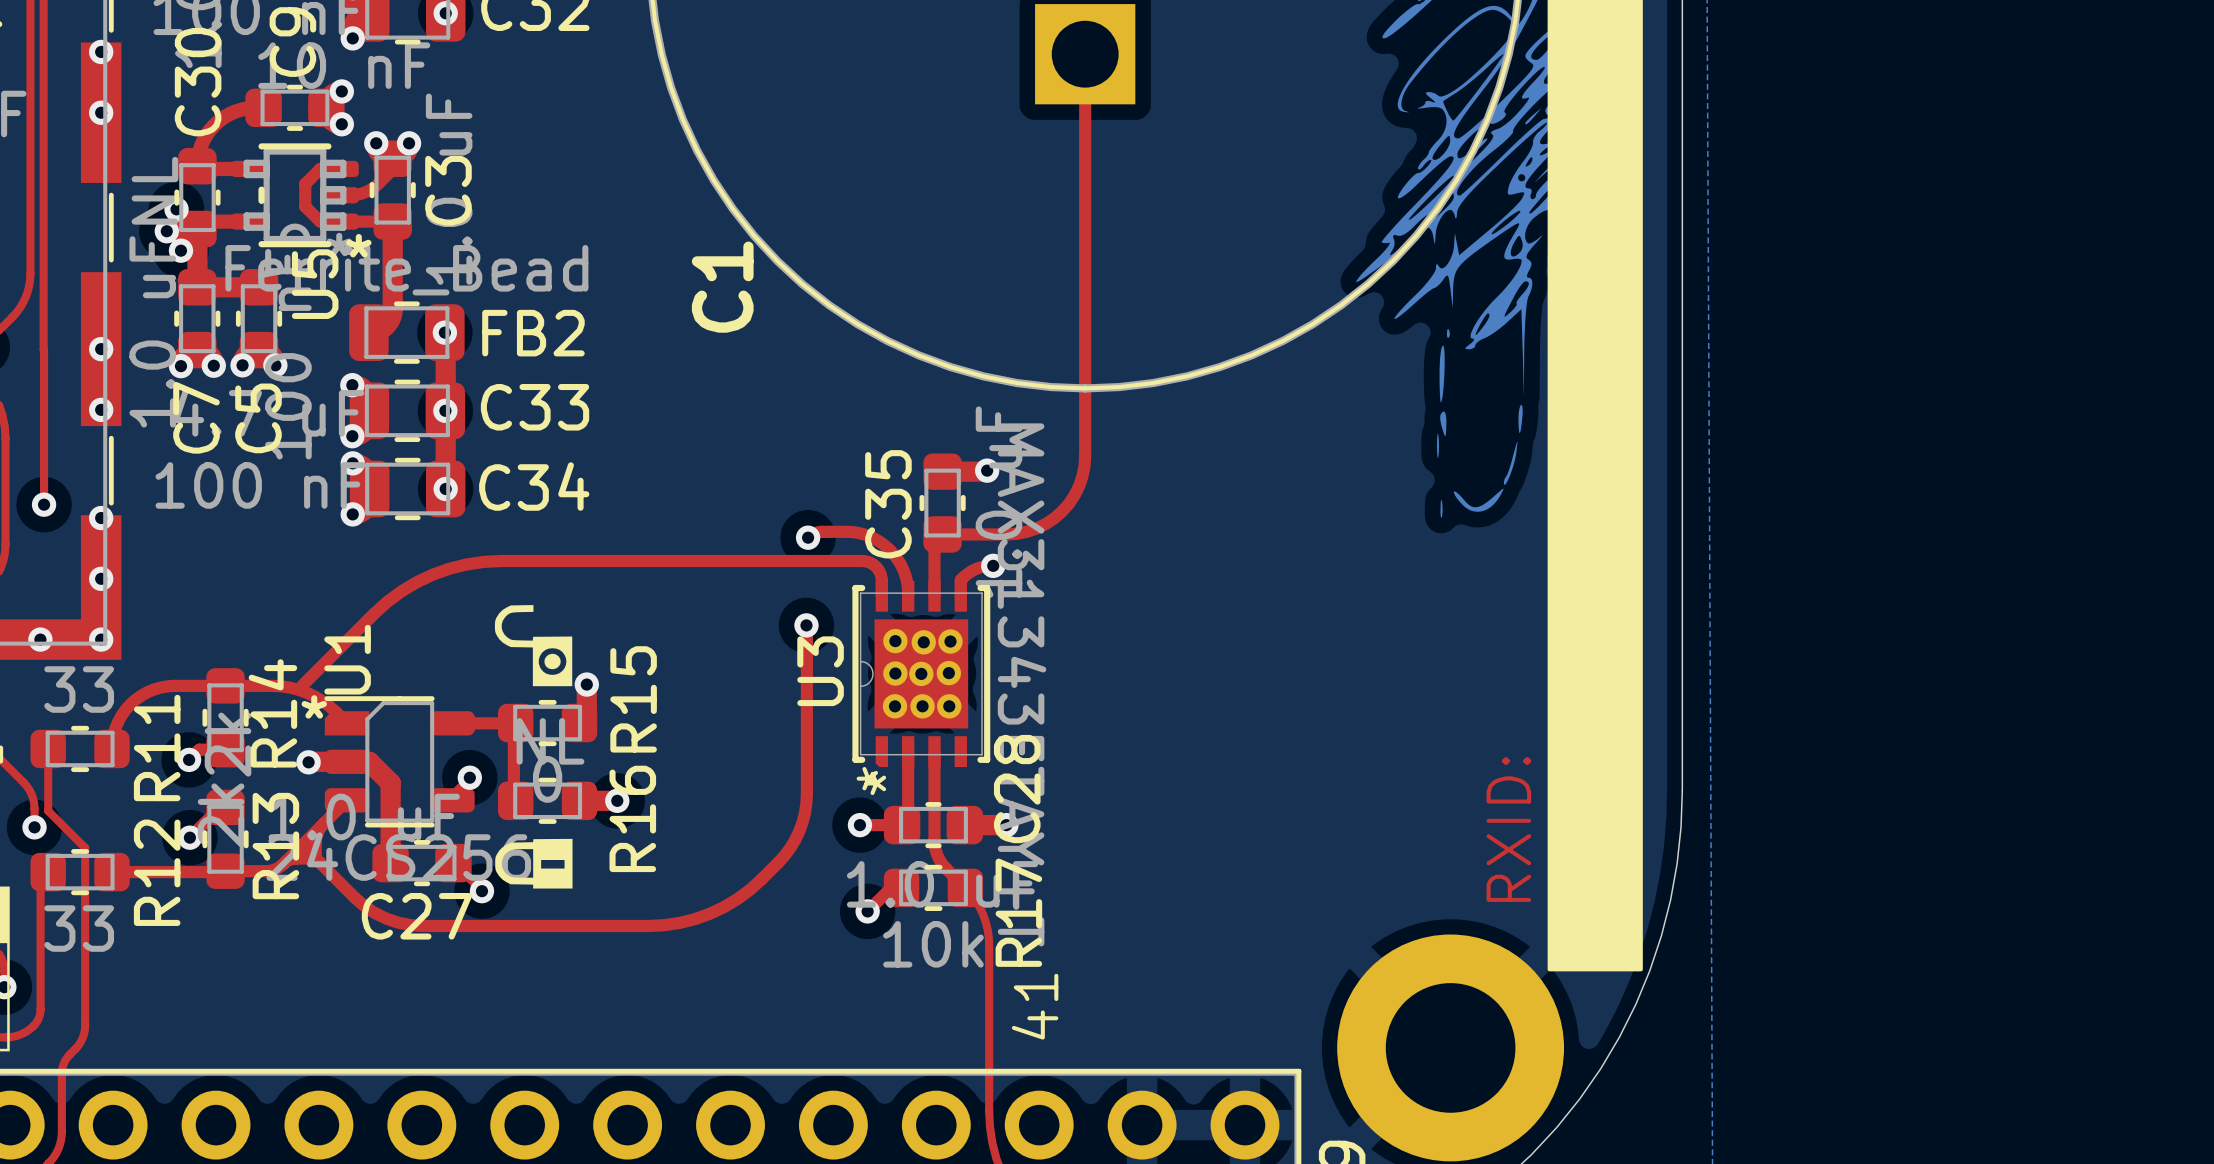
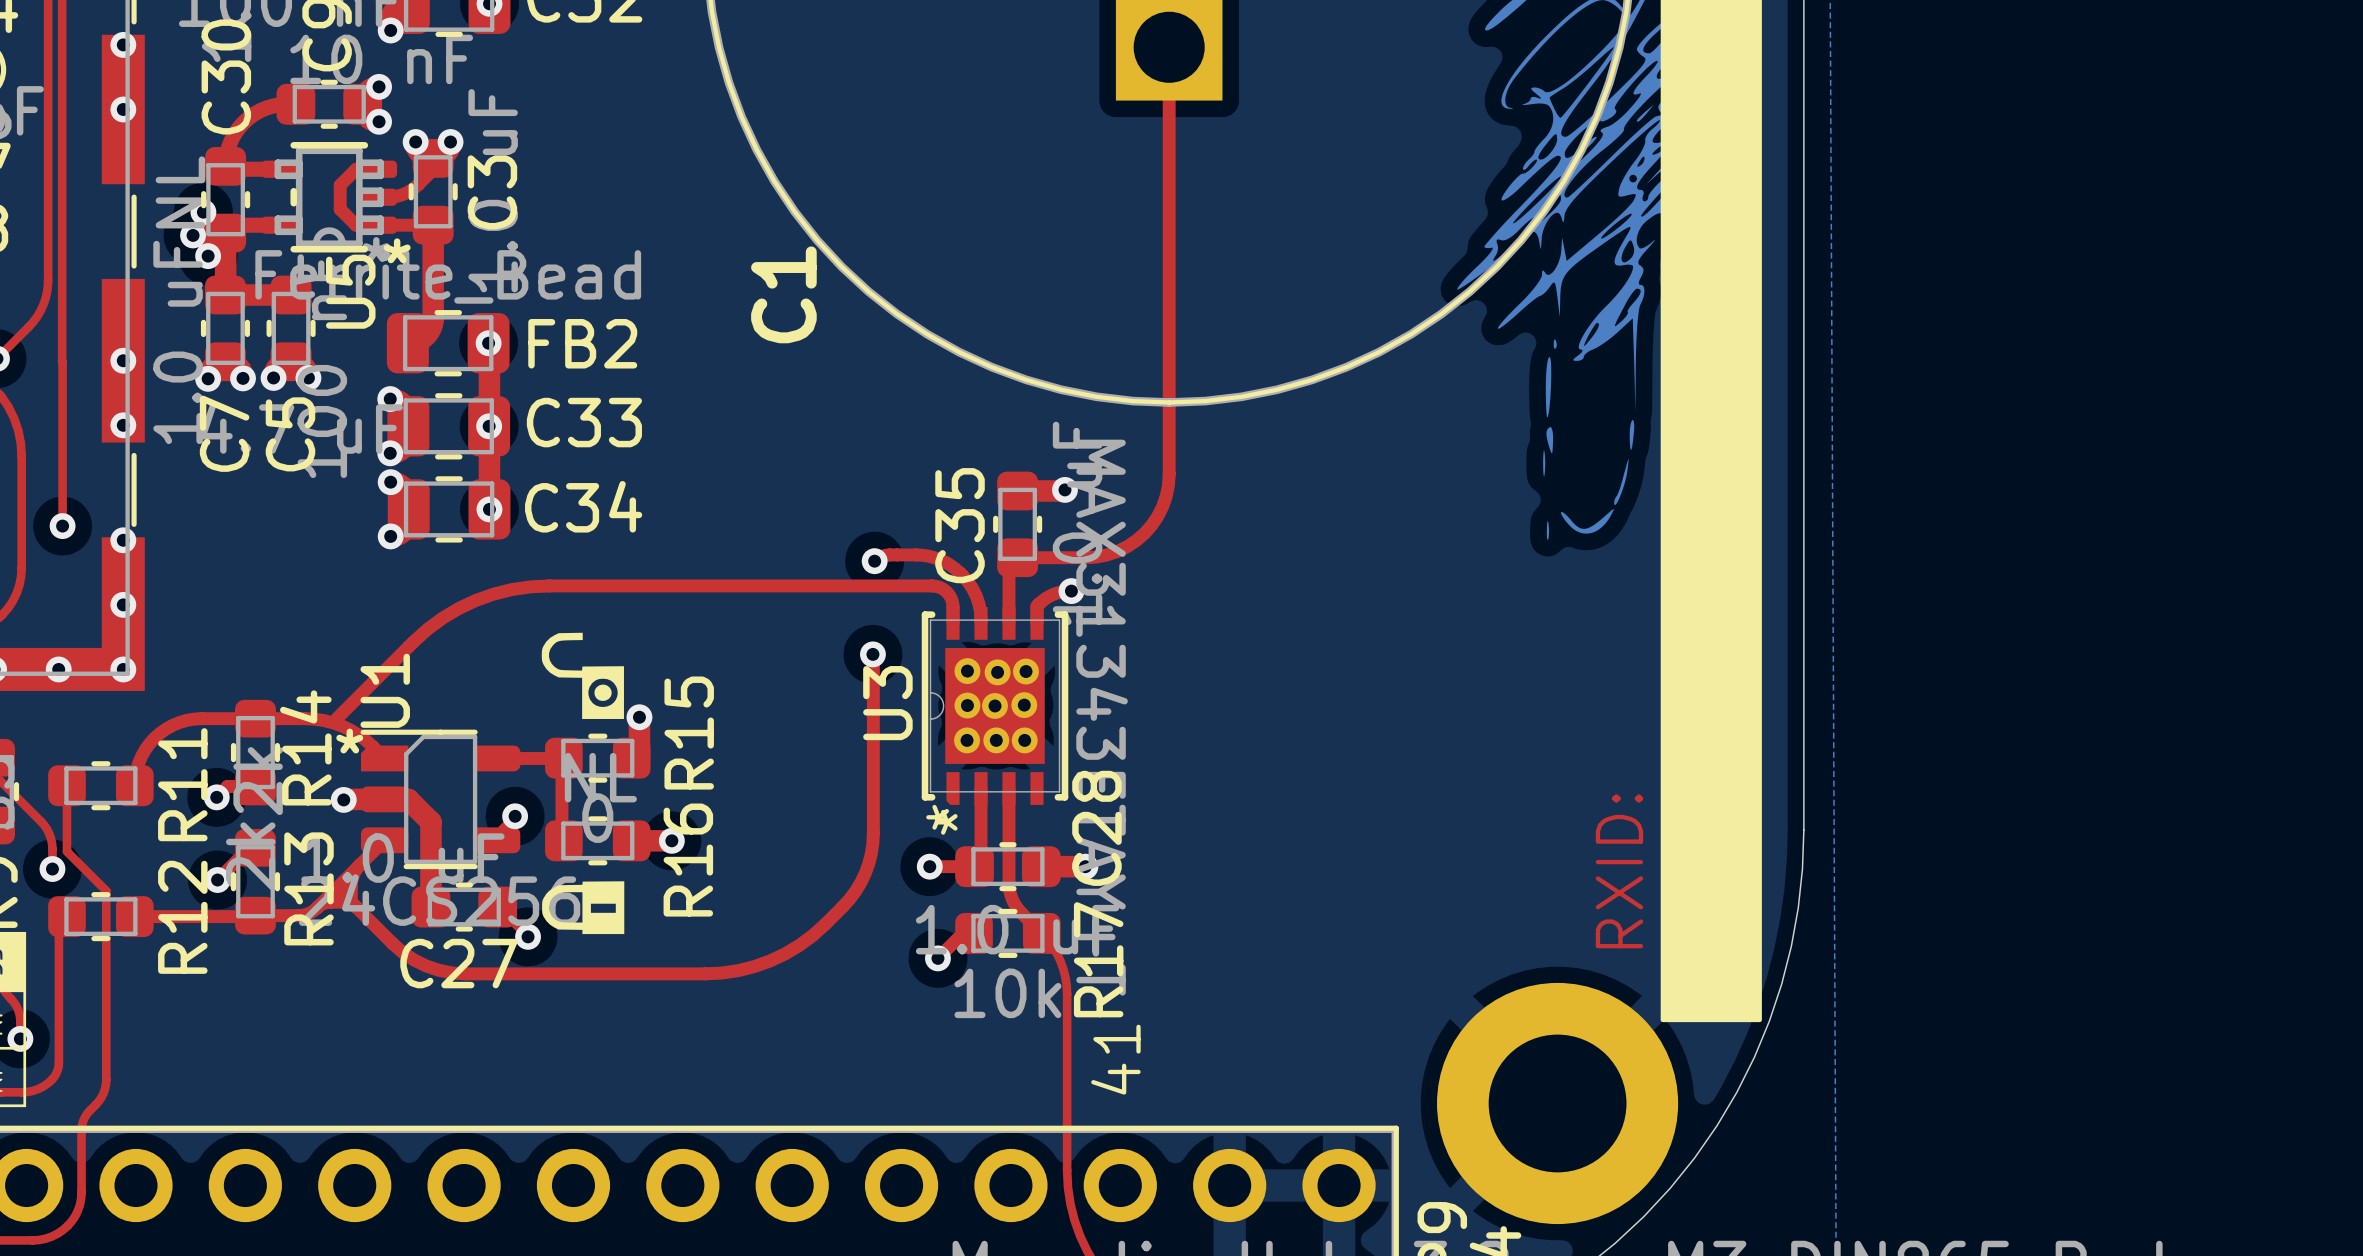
C34 value: 100 nF (260, 485) -> none
R11 value: 33 (79, 689) -> none
R12 value: 33 (79, 928) -> none

